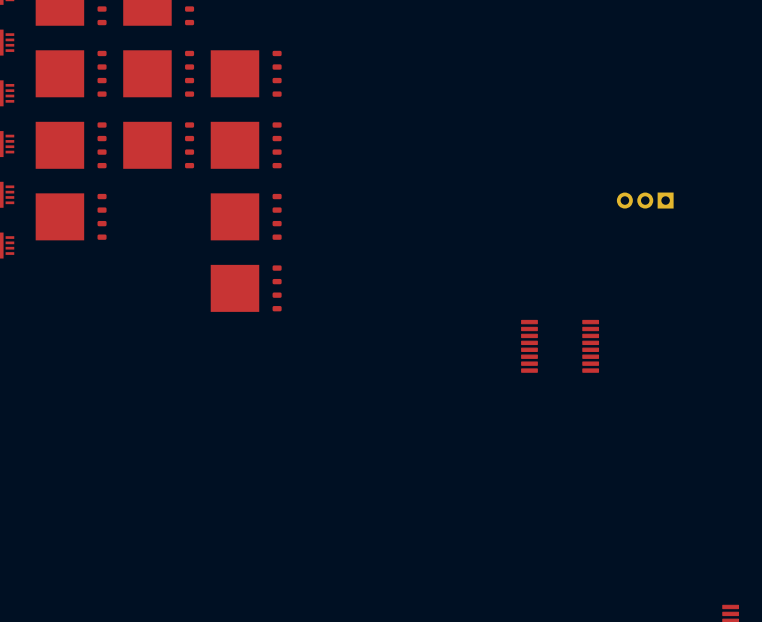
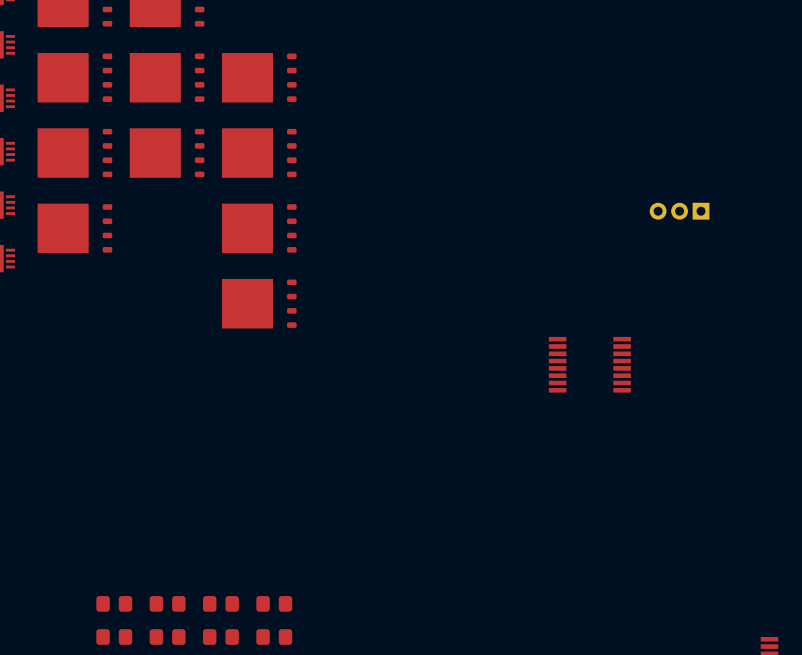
part: none -> (114, 603)
part: none -> (167, 603)
part: none -> (220, 603)
part: none -> (274, 603)
part: none -> (114, 637)
part: none -> (167, 637)
part: none -> (220, 637)
part: none -> (274, 637)

